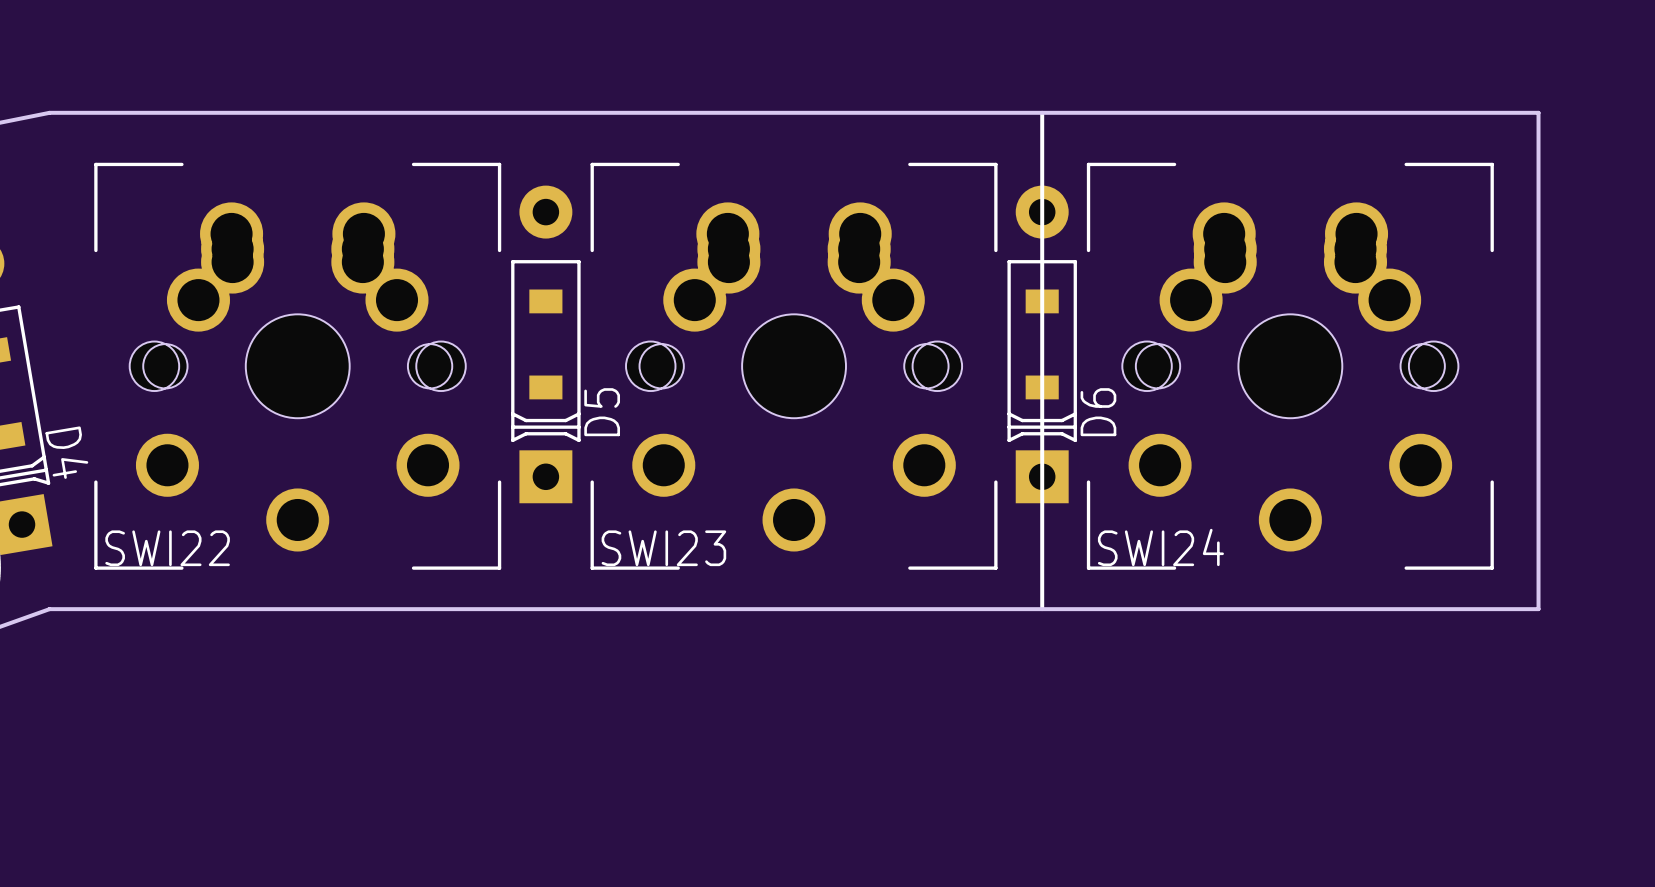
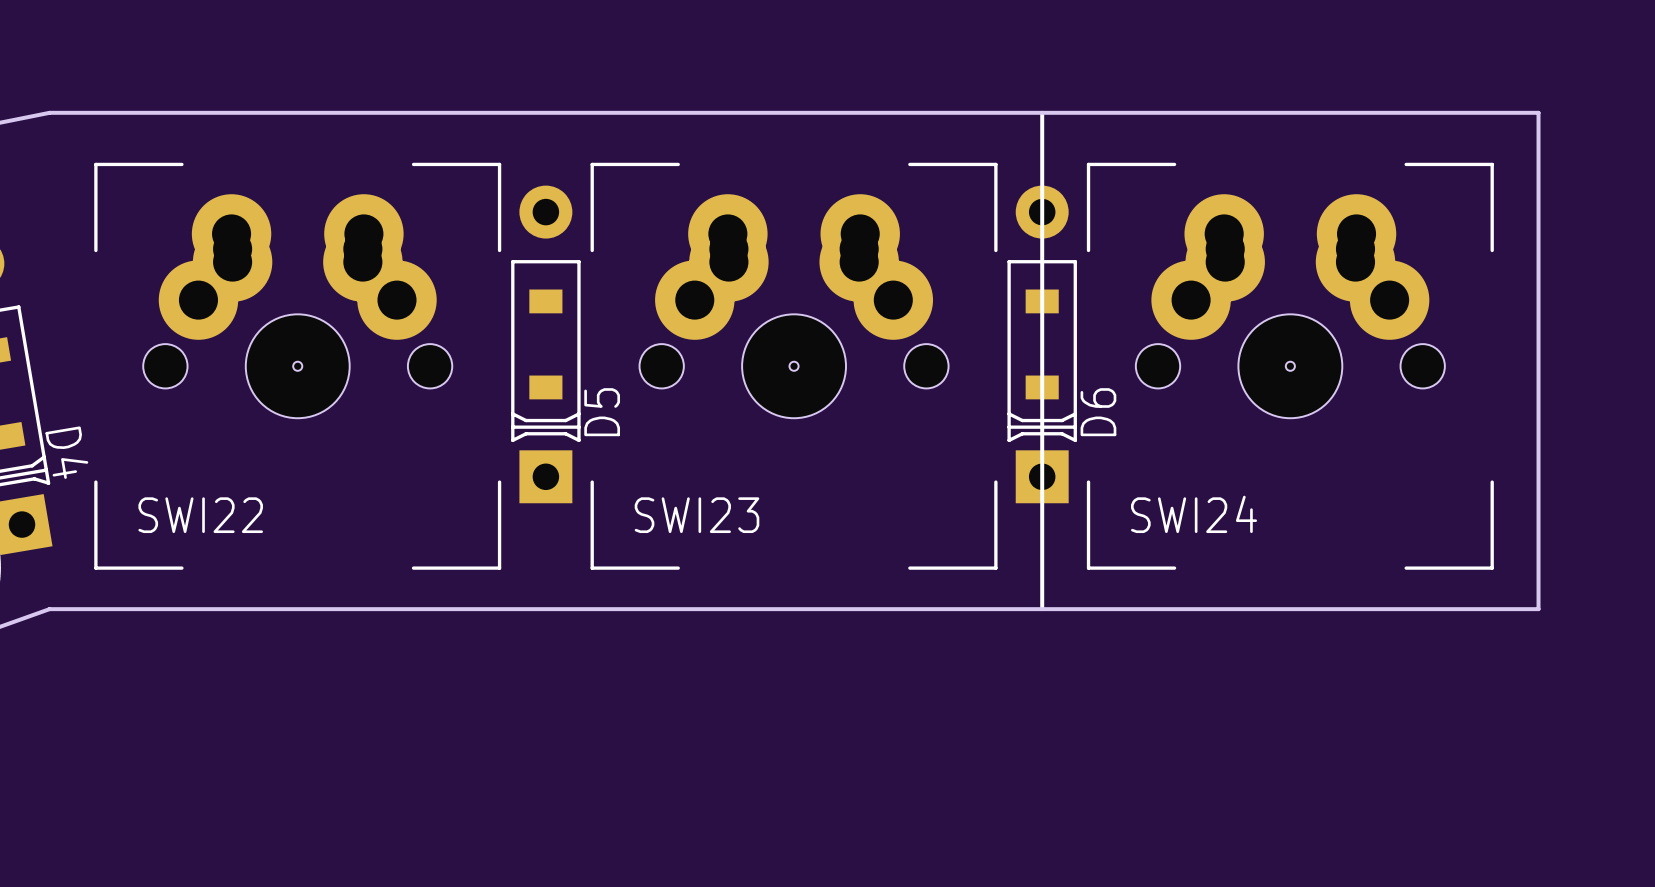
SWI22 footprint: [94, 162, 502, 570] -> [94, 162, 502, 570]
SWI23 footprint: [590, 162, 998, 570] -> [590, 162, 998, 570]
SWI24 footprint: [1086, 162, 1494, 570] -> [1086, 162, 1494, 570]

